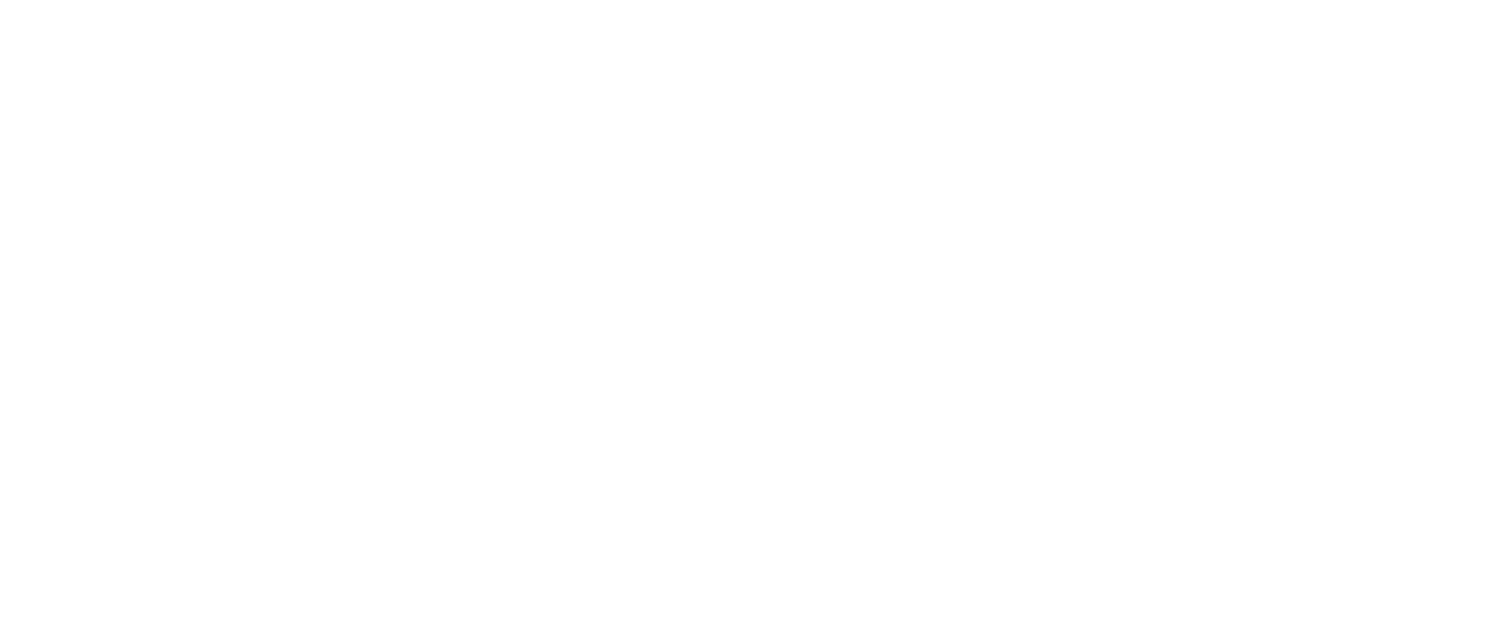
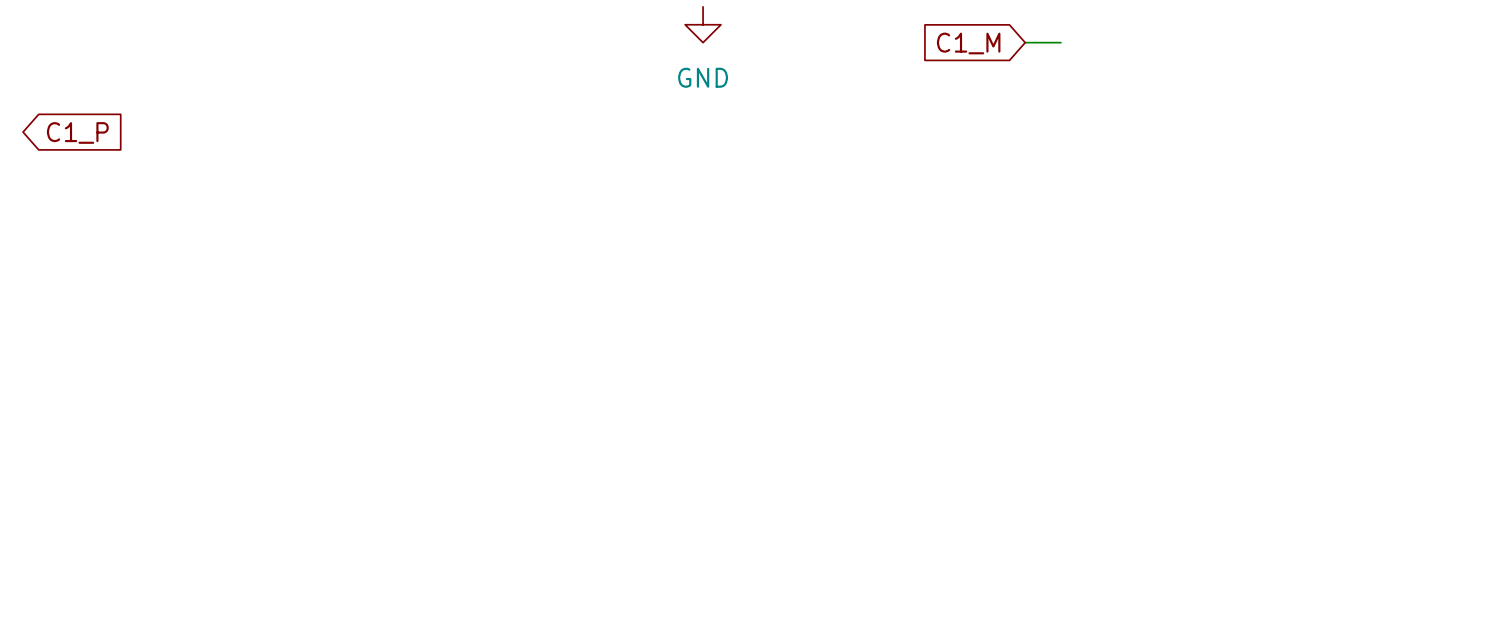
power symbol: none -> GND (703, 24)
wire: none -> (1025, 42) (1060, 42)
global label: none -> C1_M (968, 43)
global label: none -> C1_P (77, 132)

